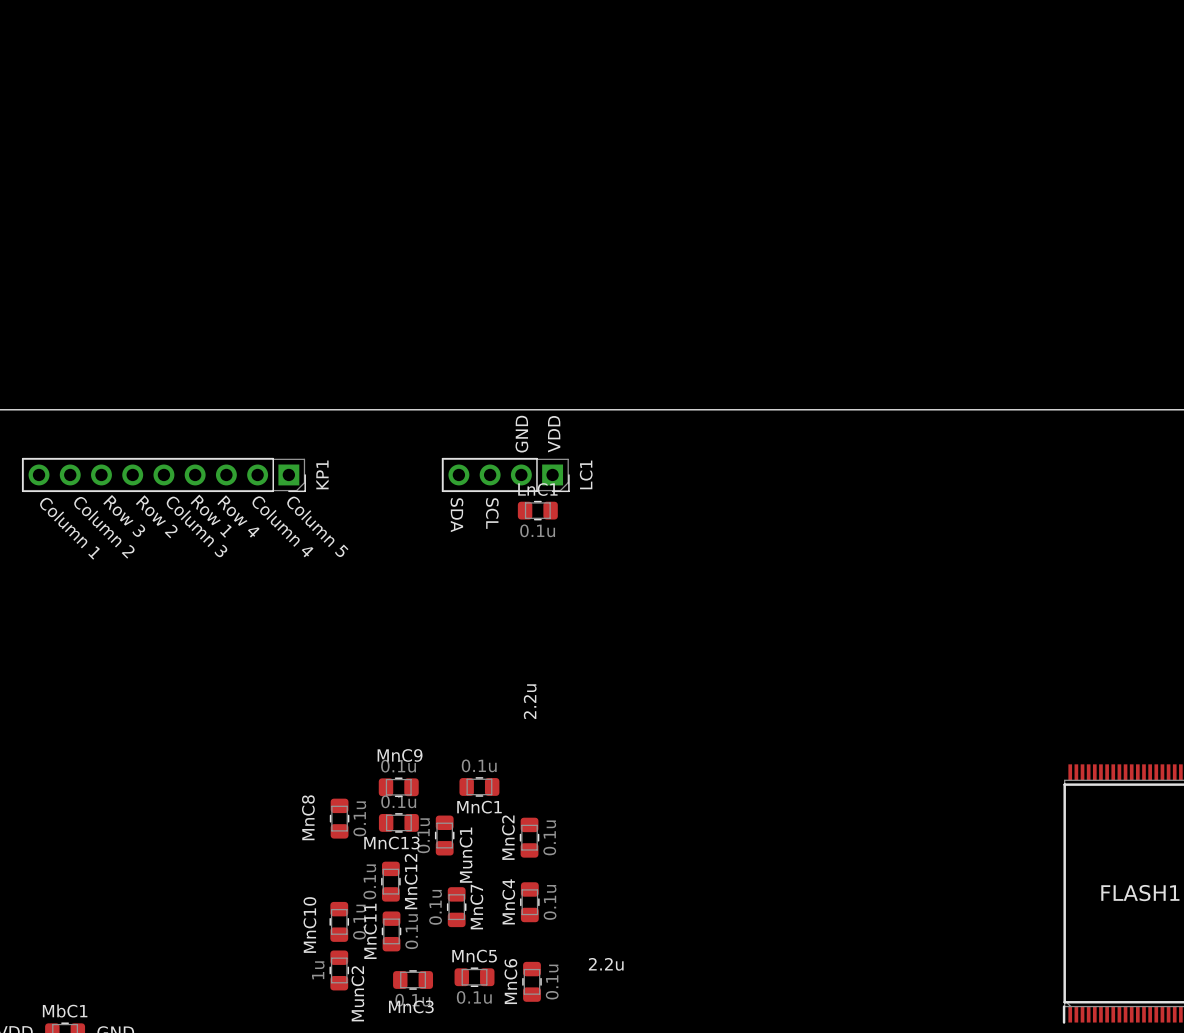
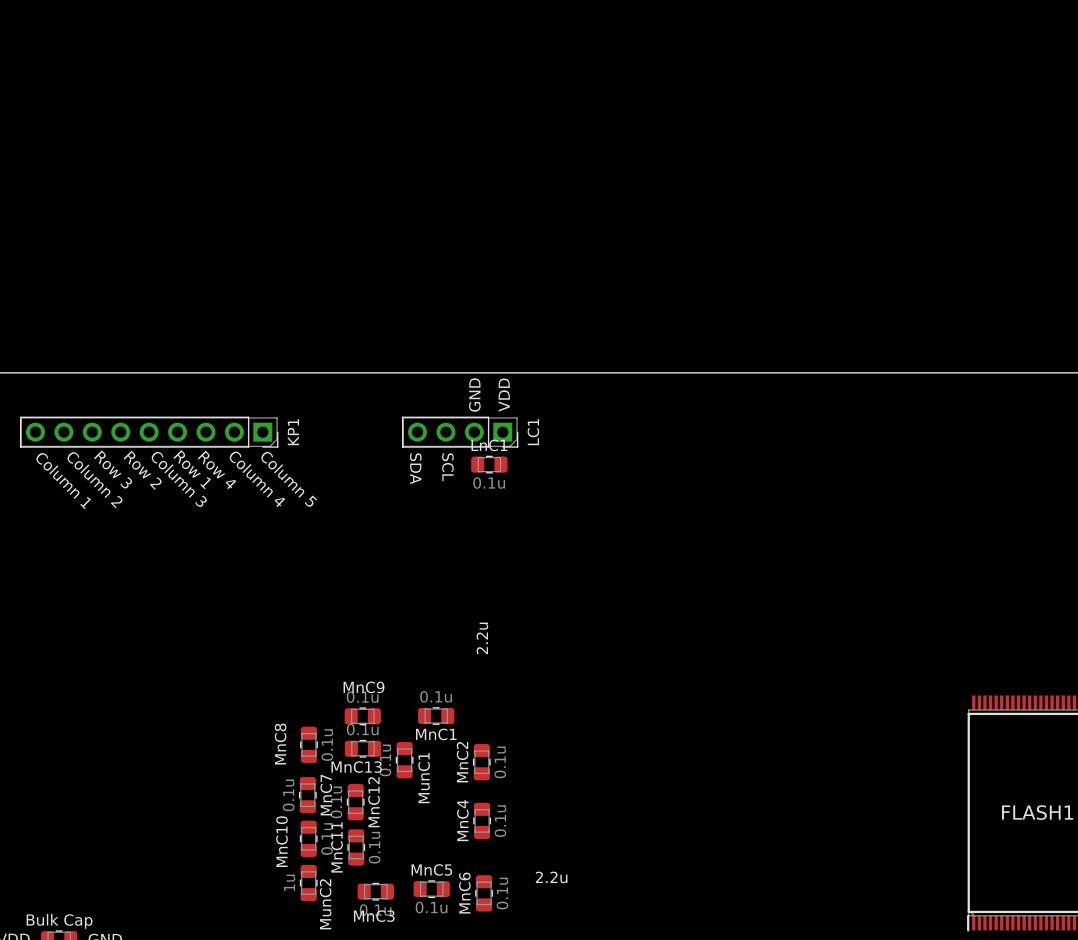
MnC7 position: (456, 907) -> (307, 795)
MbC1 name: MbC1 (65, 1010) -> Bulk Cap (59, 921)

